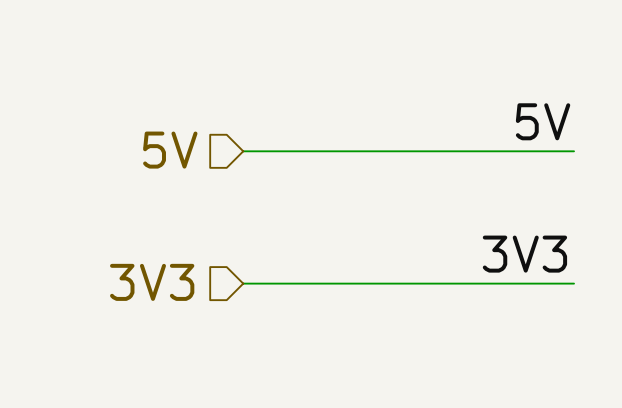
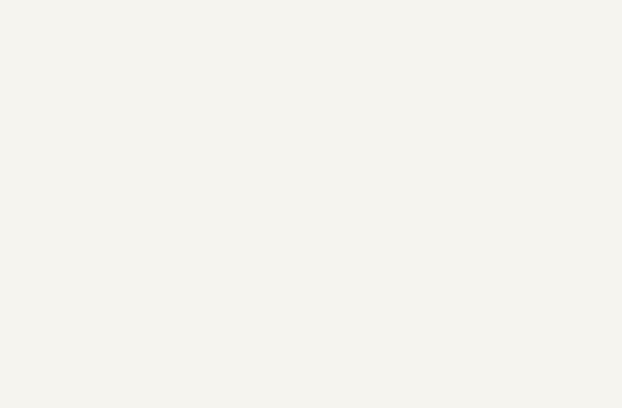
label: 5V (543, 121) -> none
hierarchical label: 5V (170, 150) -> none
wire: (243, 151) (574, 151) -> none
label: 3V3 (524, 254) -> none
hierarchical label: 3V3 (152, 282) -> none
wire: (243, 283) (574, 283) -> none

